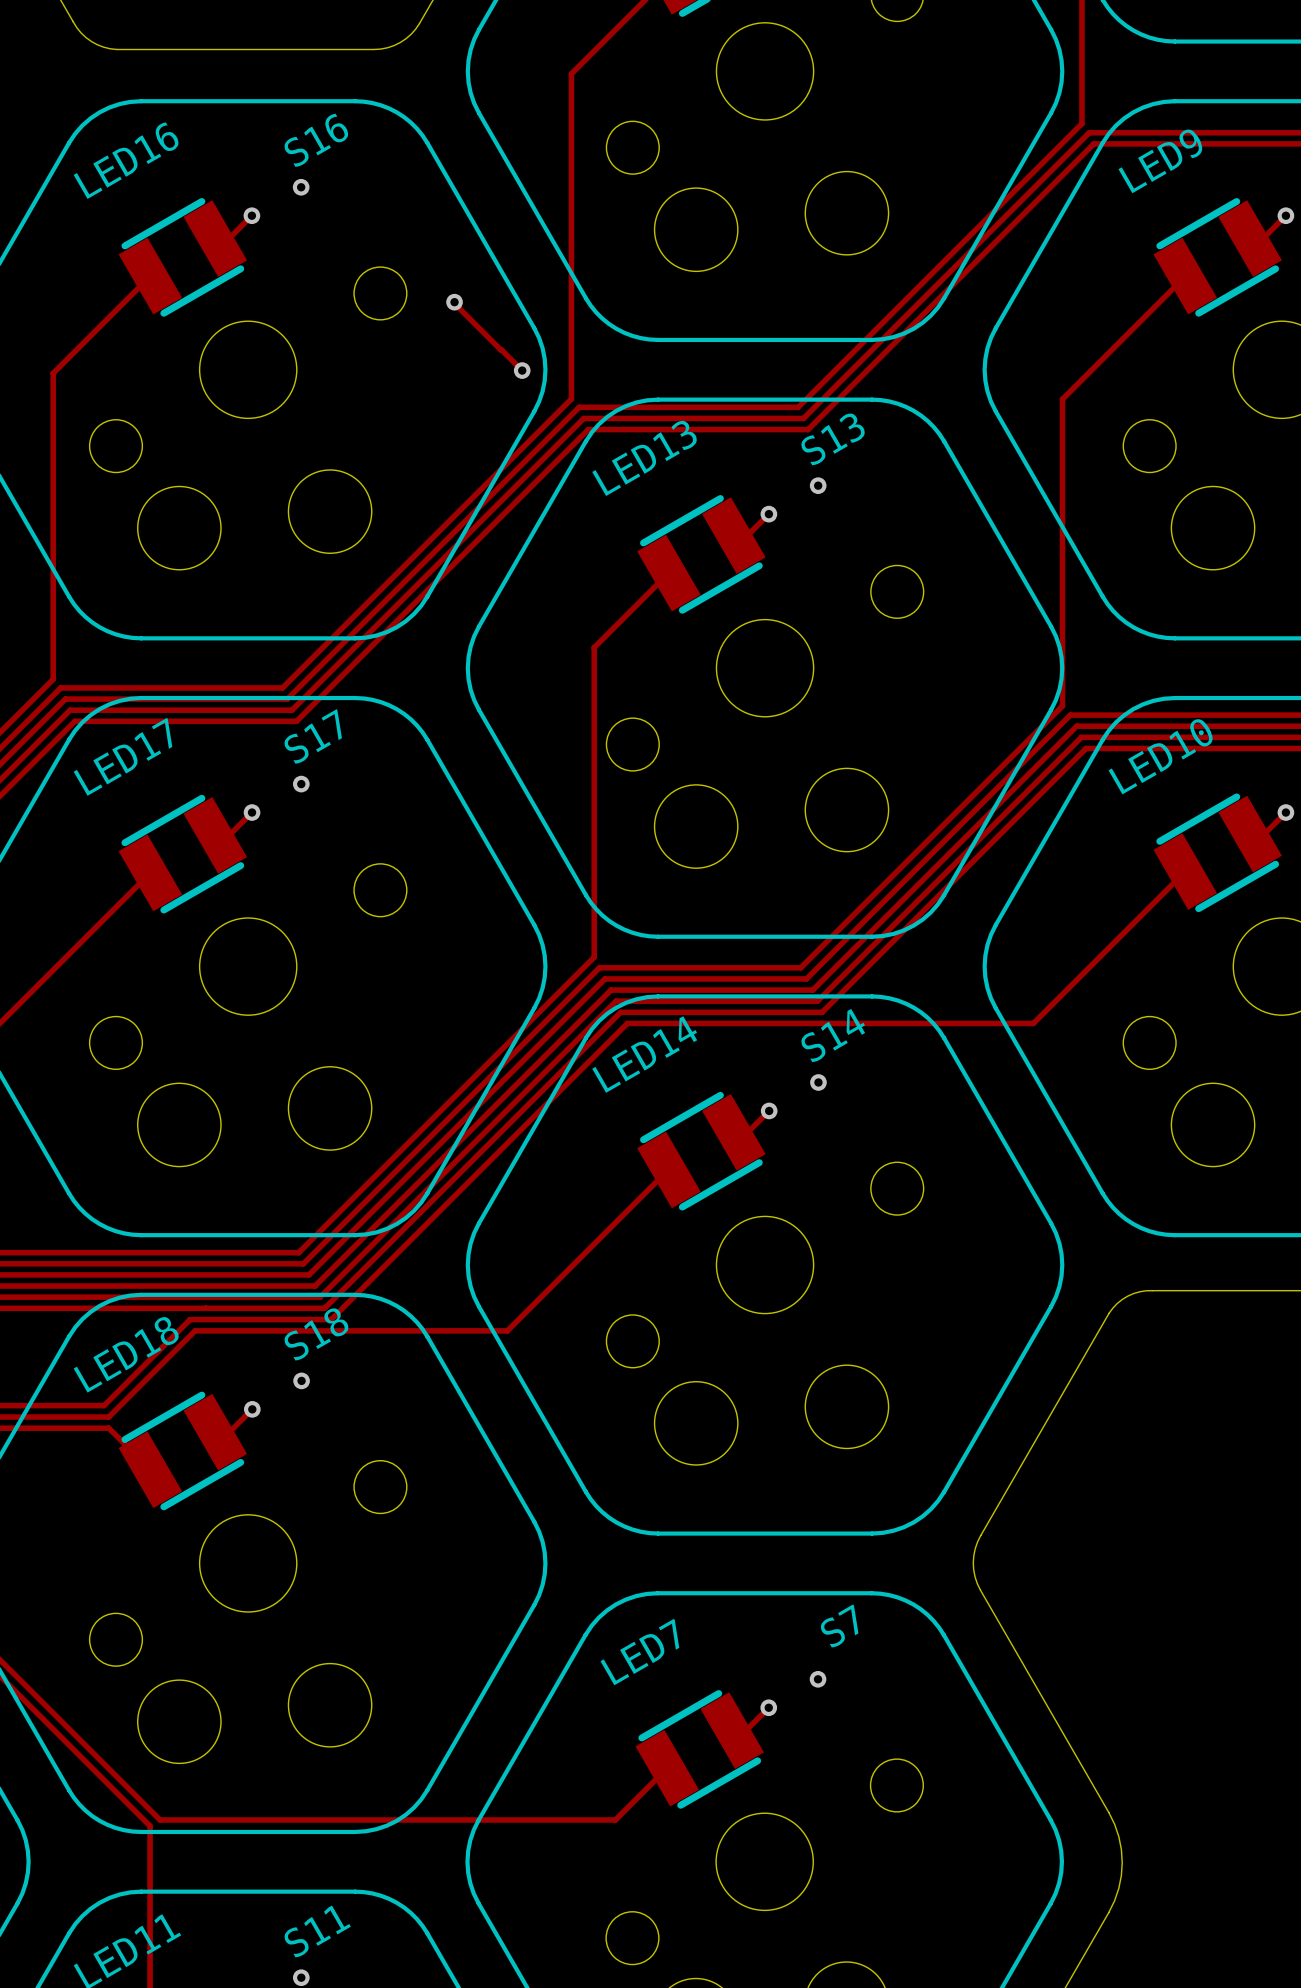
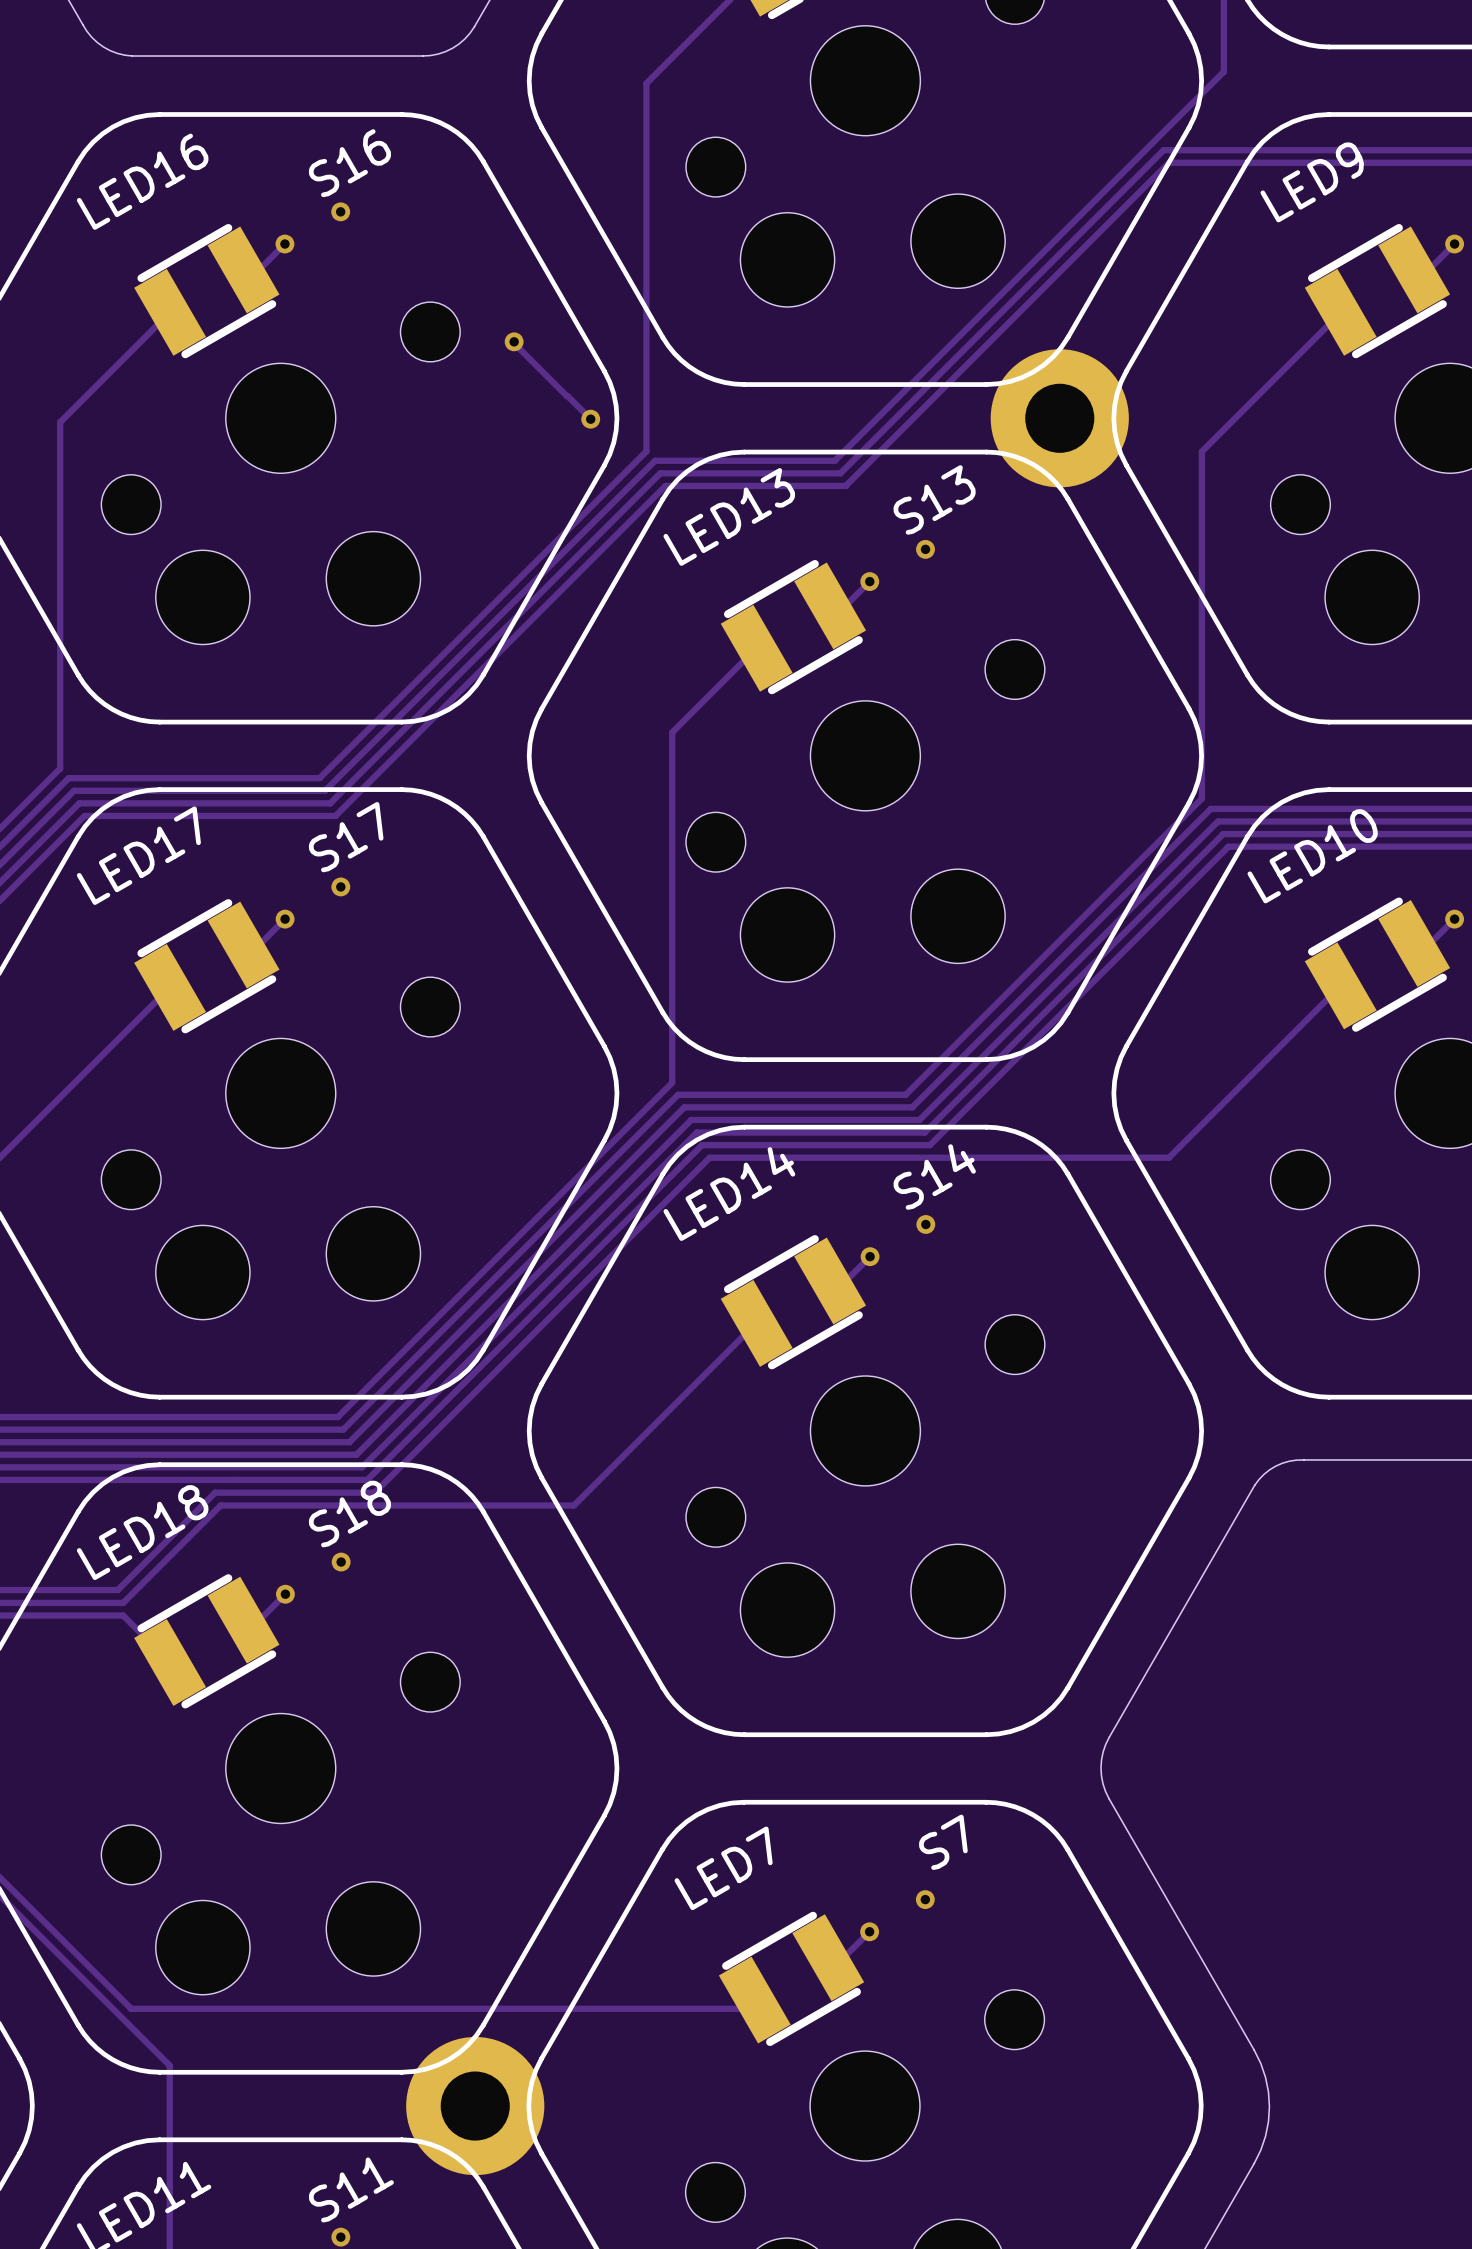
track: (1081, 63) (1081, 123) (798, 407) (738, 407) -> (1223, 71) (834, 460)
track: (1089, 132) (803, 418) (742, 418) -> (1232, 150) (1163, 150) (840, 473)
track: (1093, 143) (808, 429) (747, 429) -> (1237, 162) (1168, 162) (845, 485)
part: none -> (1059, 418)
track: (115, 1775) (160, 1819) (615, 1819) (659, 1775) -> (131, 2008) (746, 2008)
part: none -> (475, 2106)

